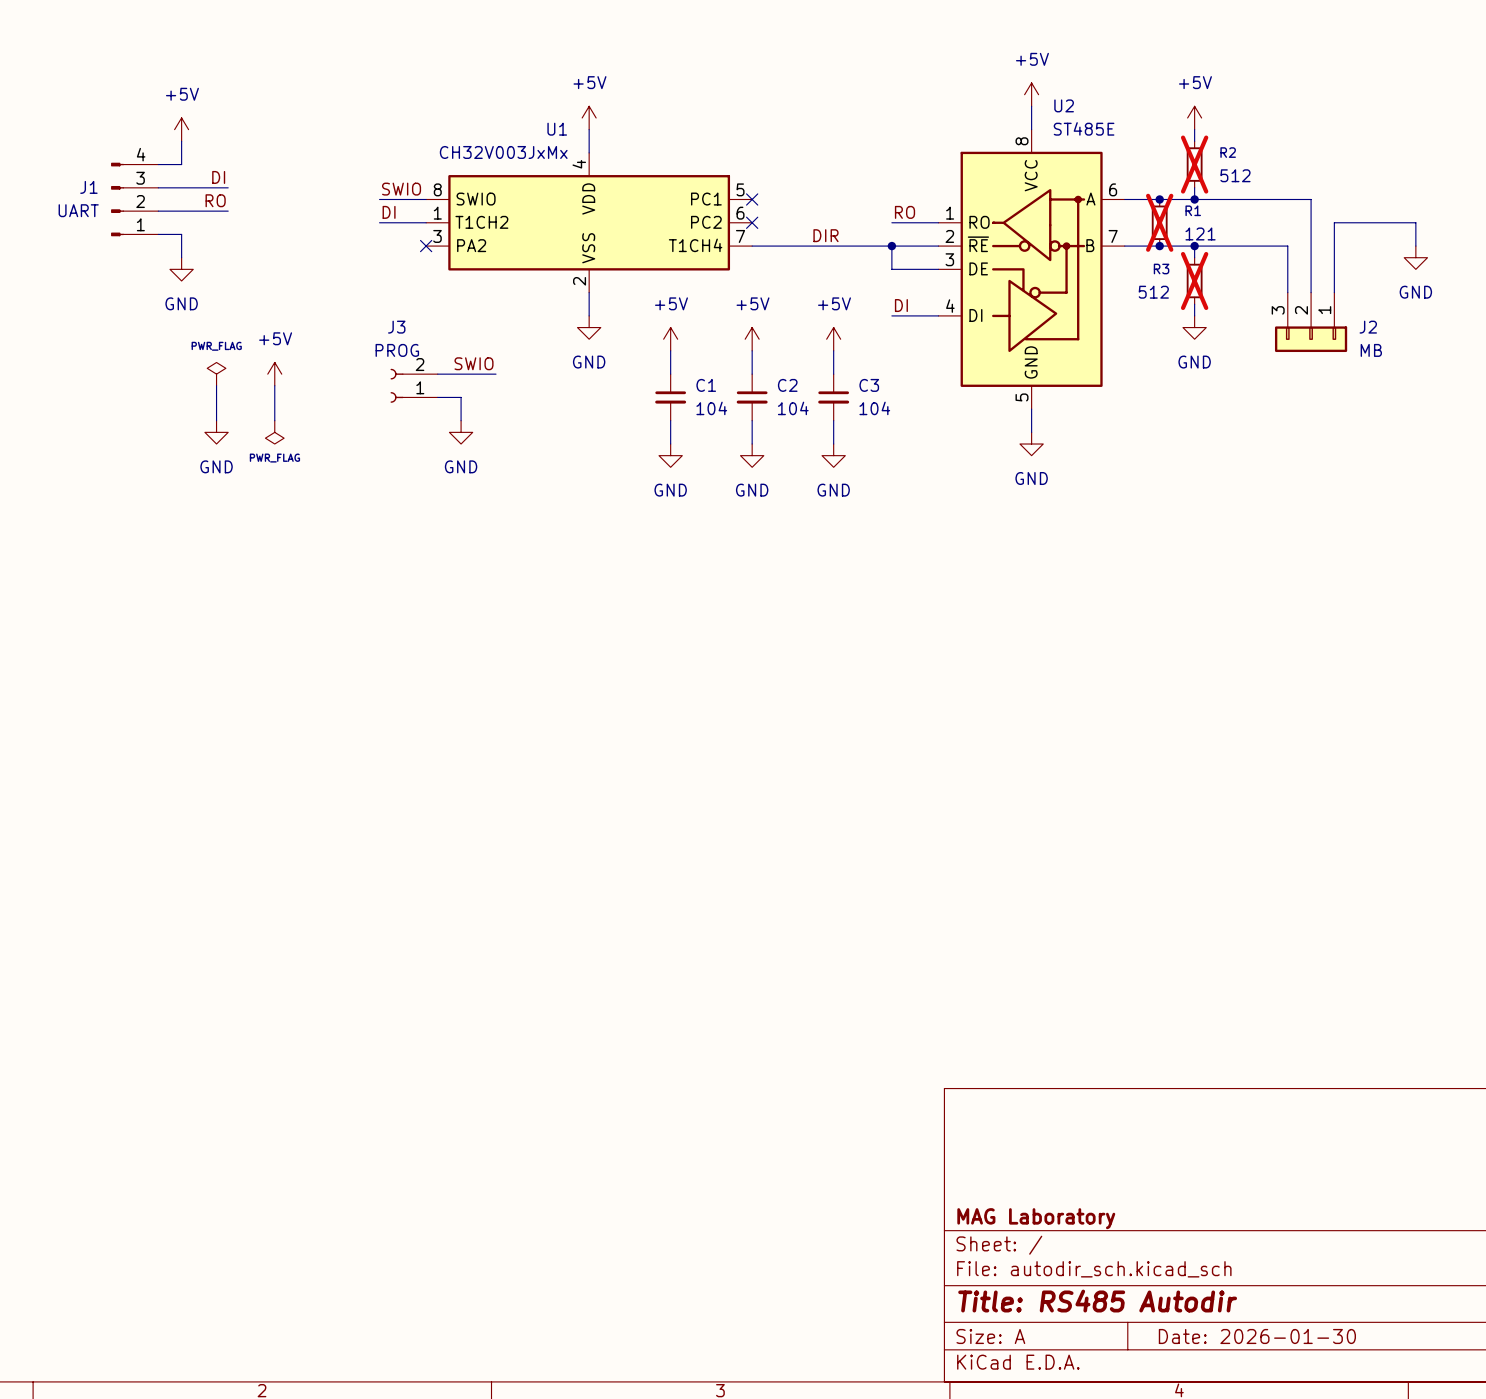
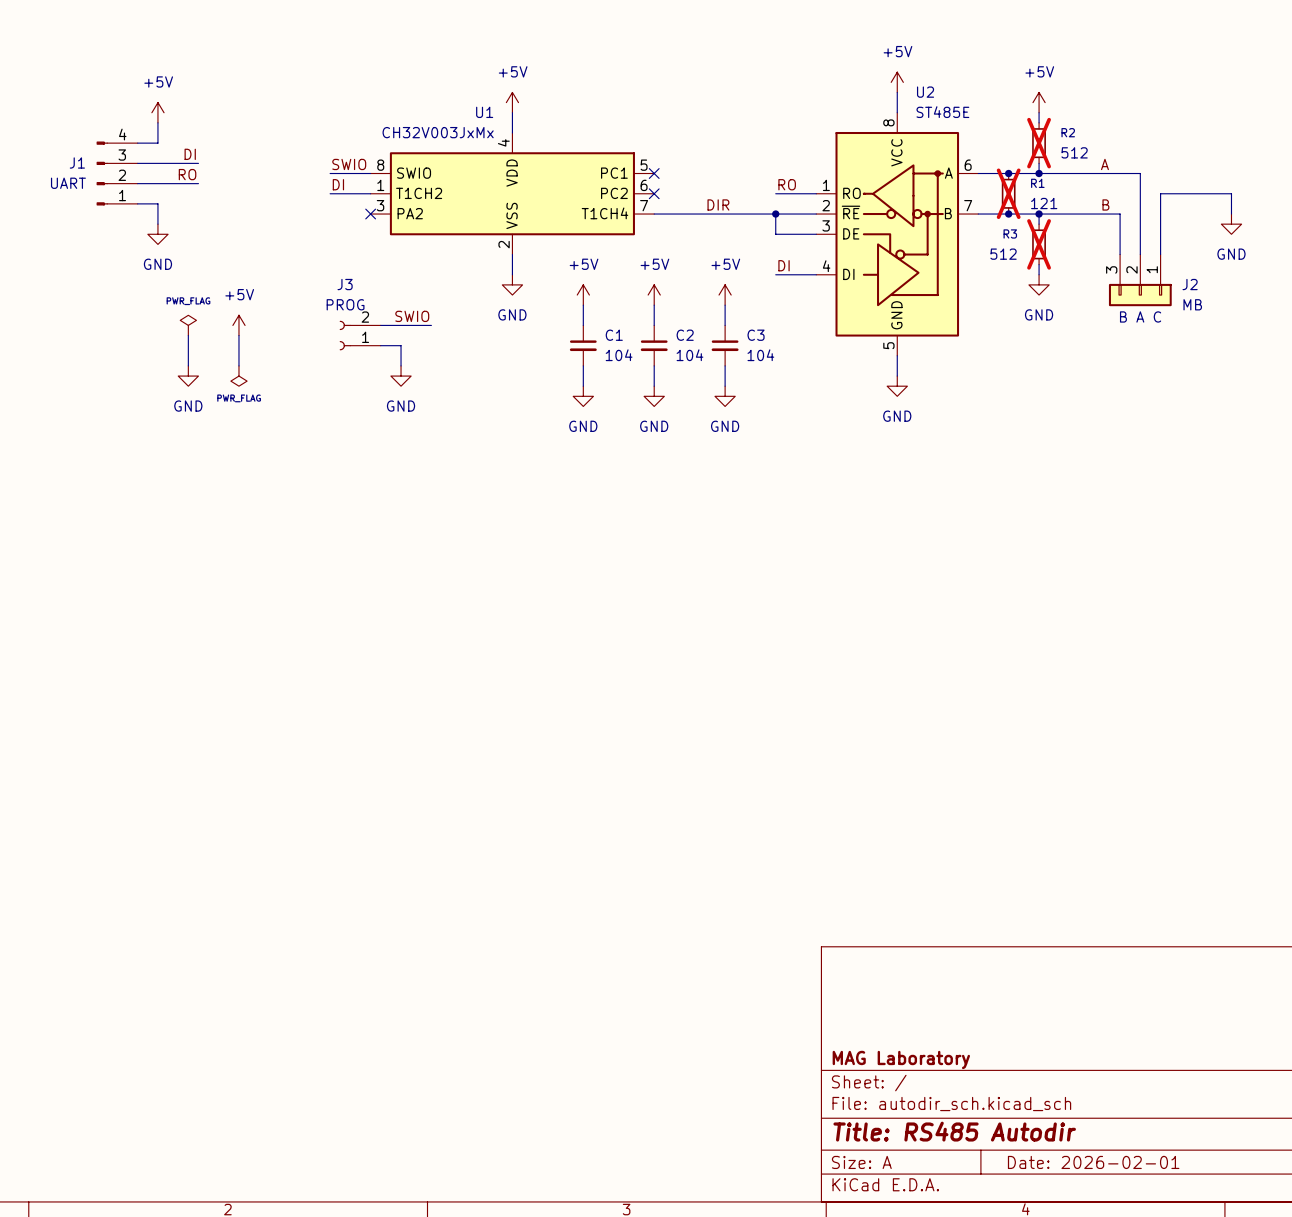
label: none -> A (1104, 164)
label: none -> B (1105, 204)
text: none -> B A C (1140, 316)
title block: Date: 2026-01-30 (1257, 1336) -> Date: 2026-02-01 (1093, 1162)

